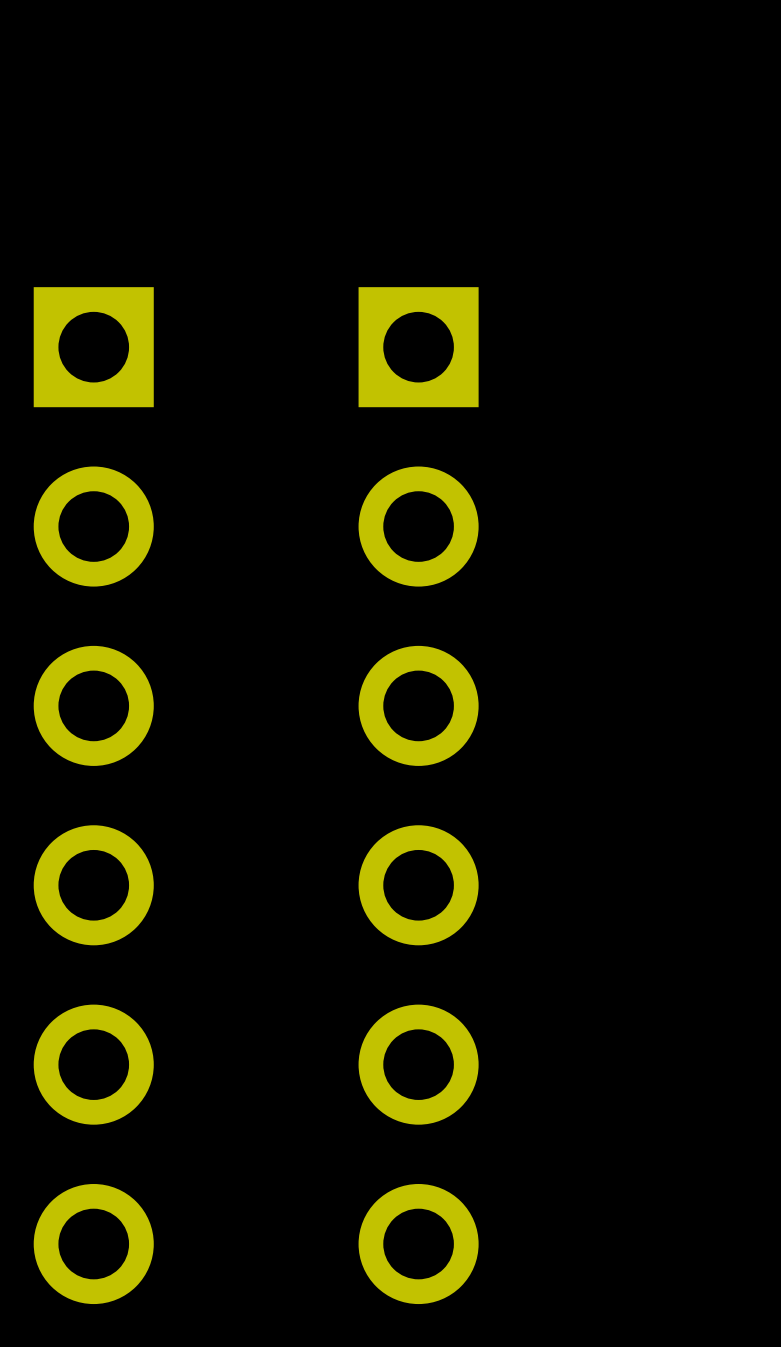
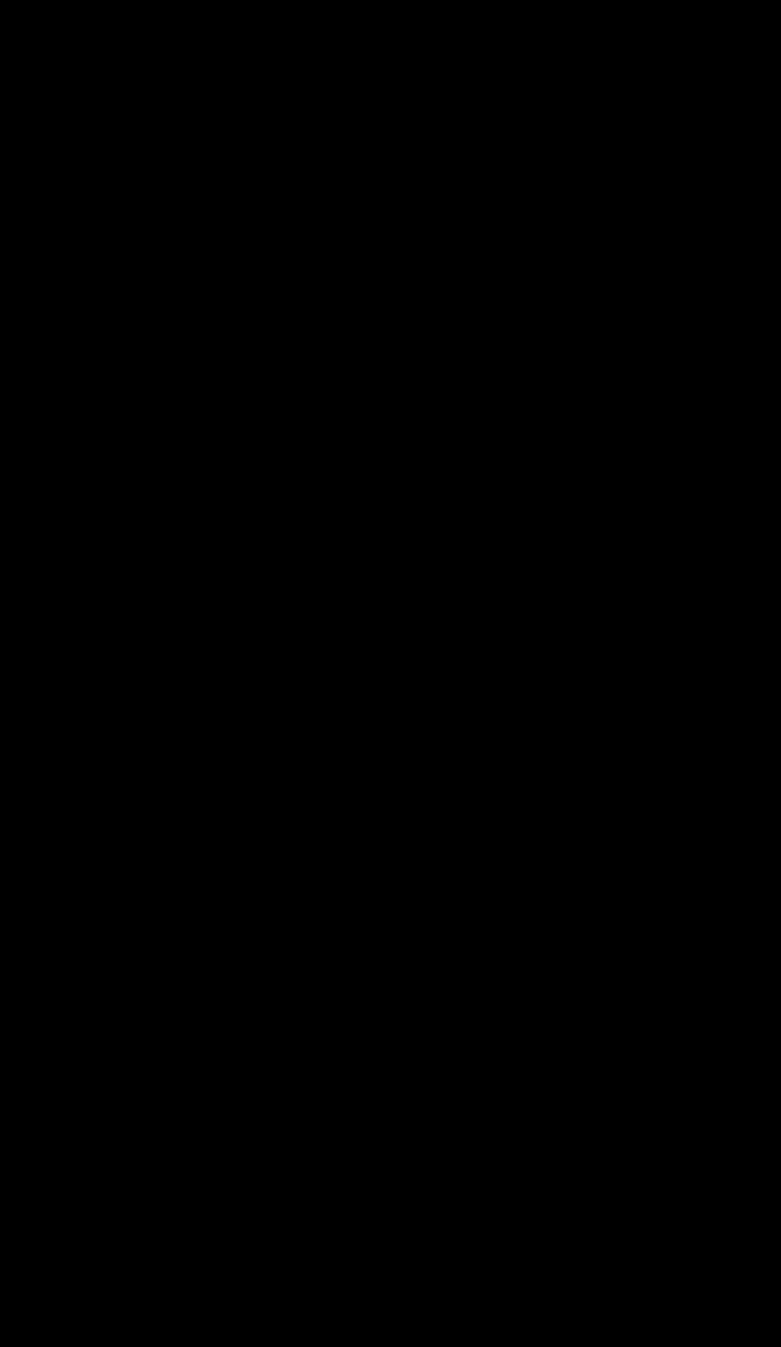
part: (93, 795) -> none
part: (418, 795) -> none

